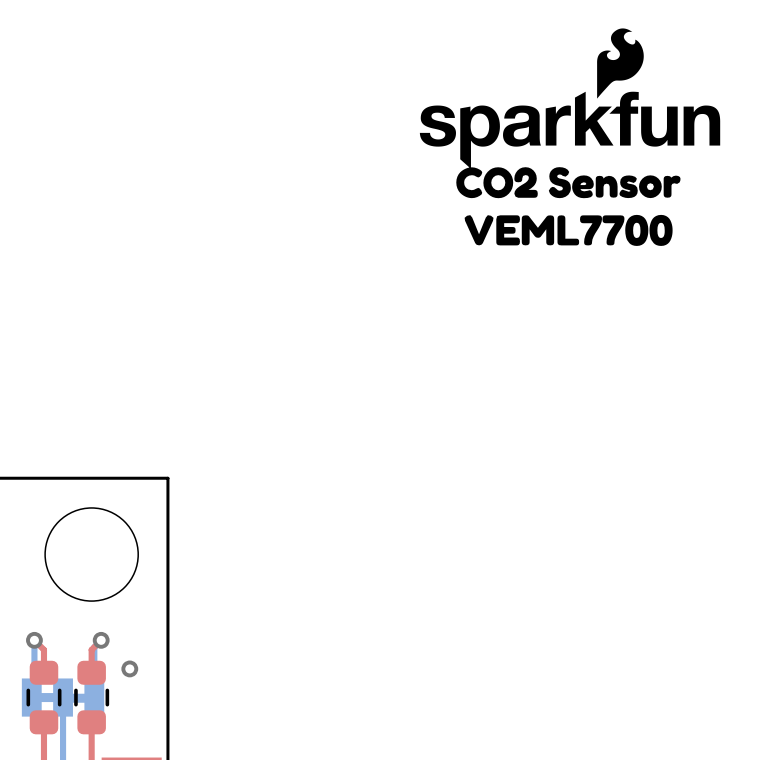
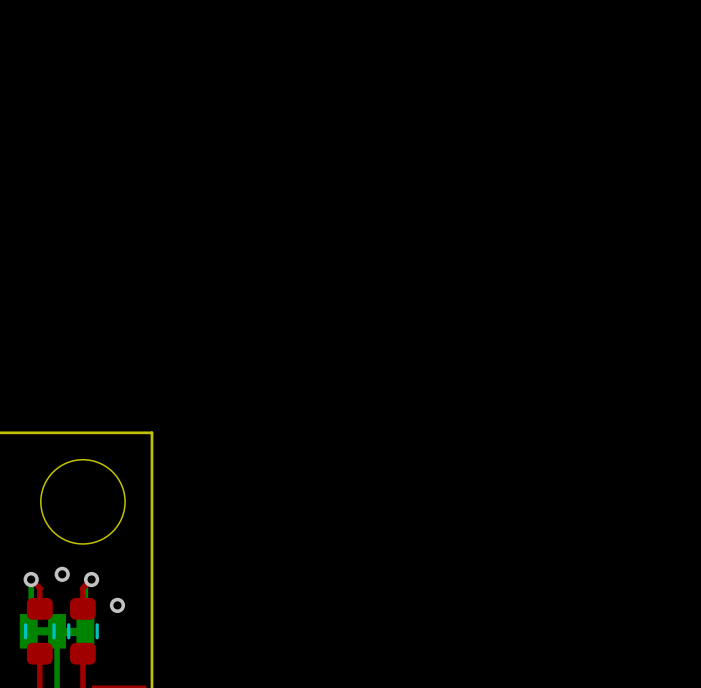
drawing: [419, 28, 721, 246] -> none
via: none -> (62, 574)

